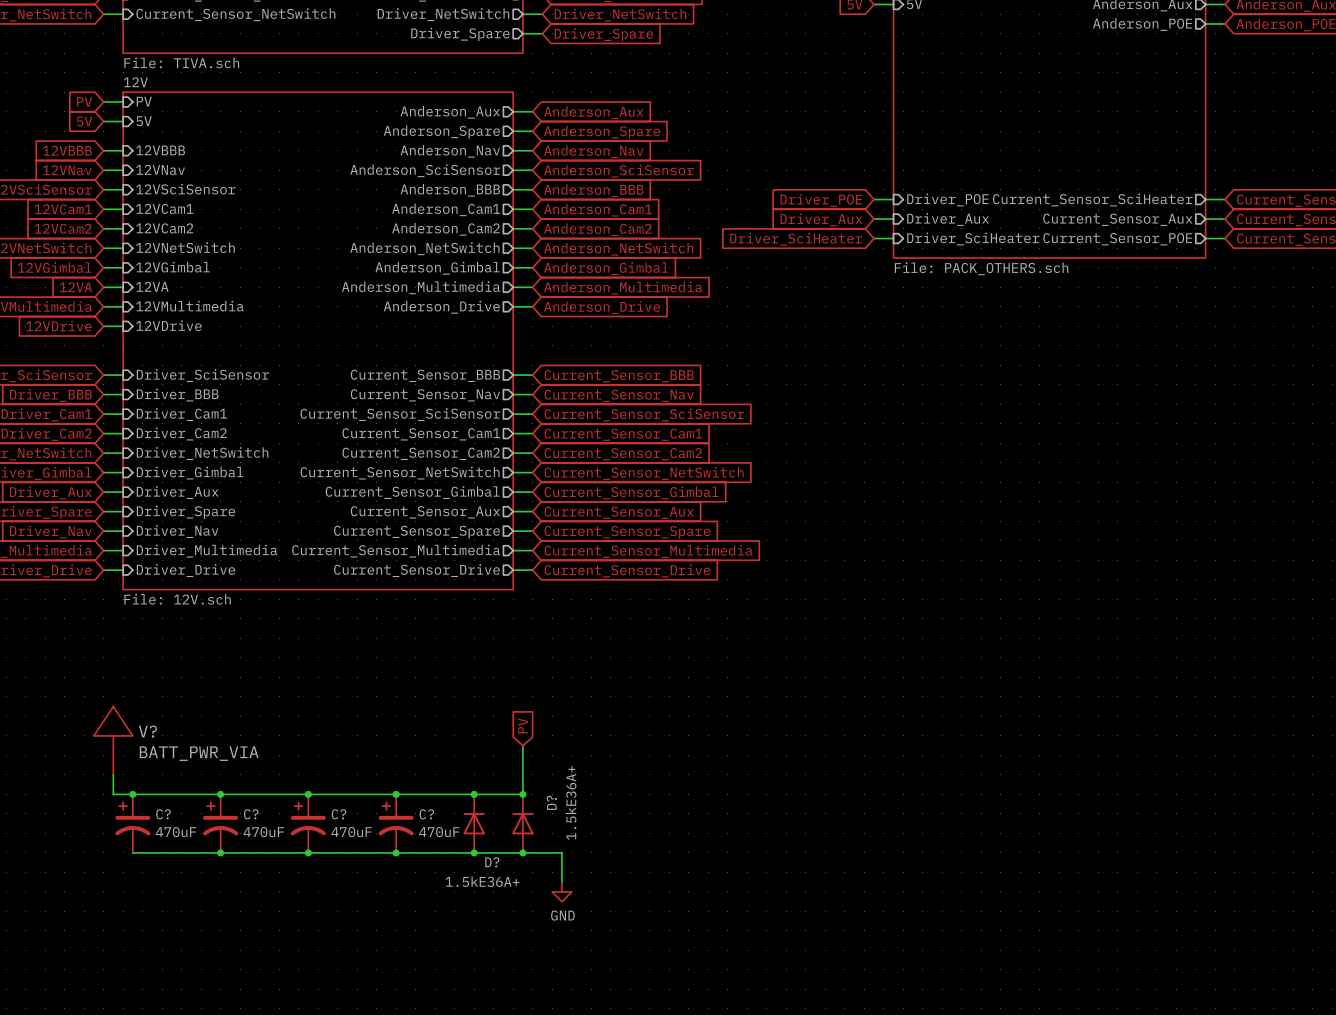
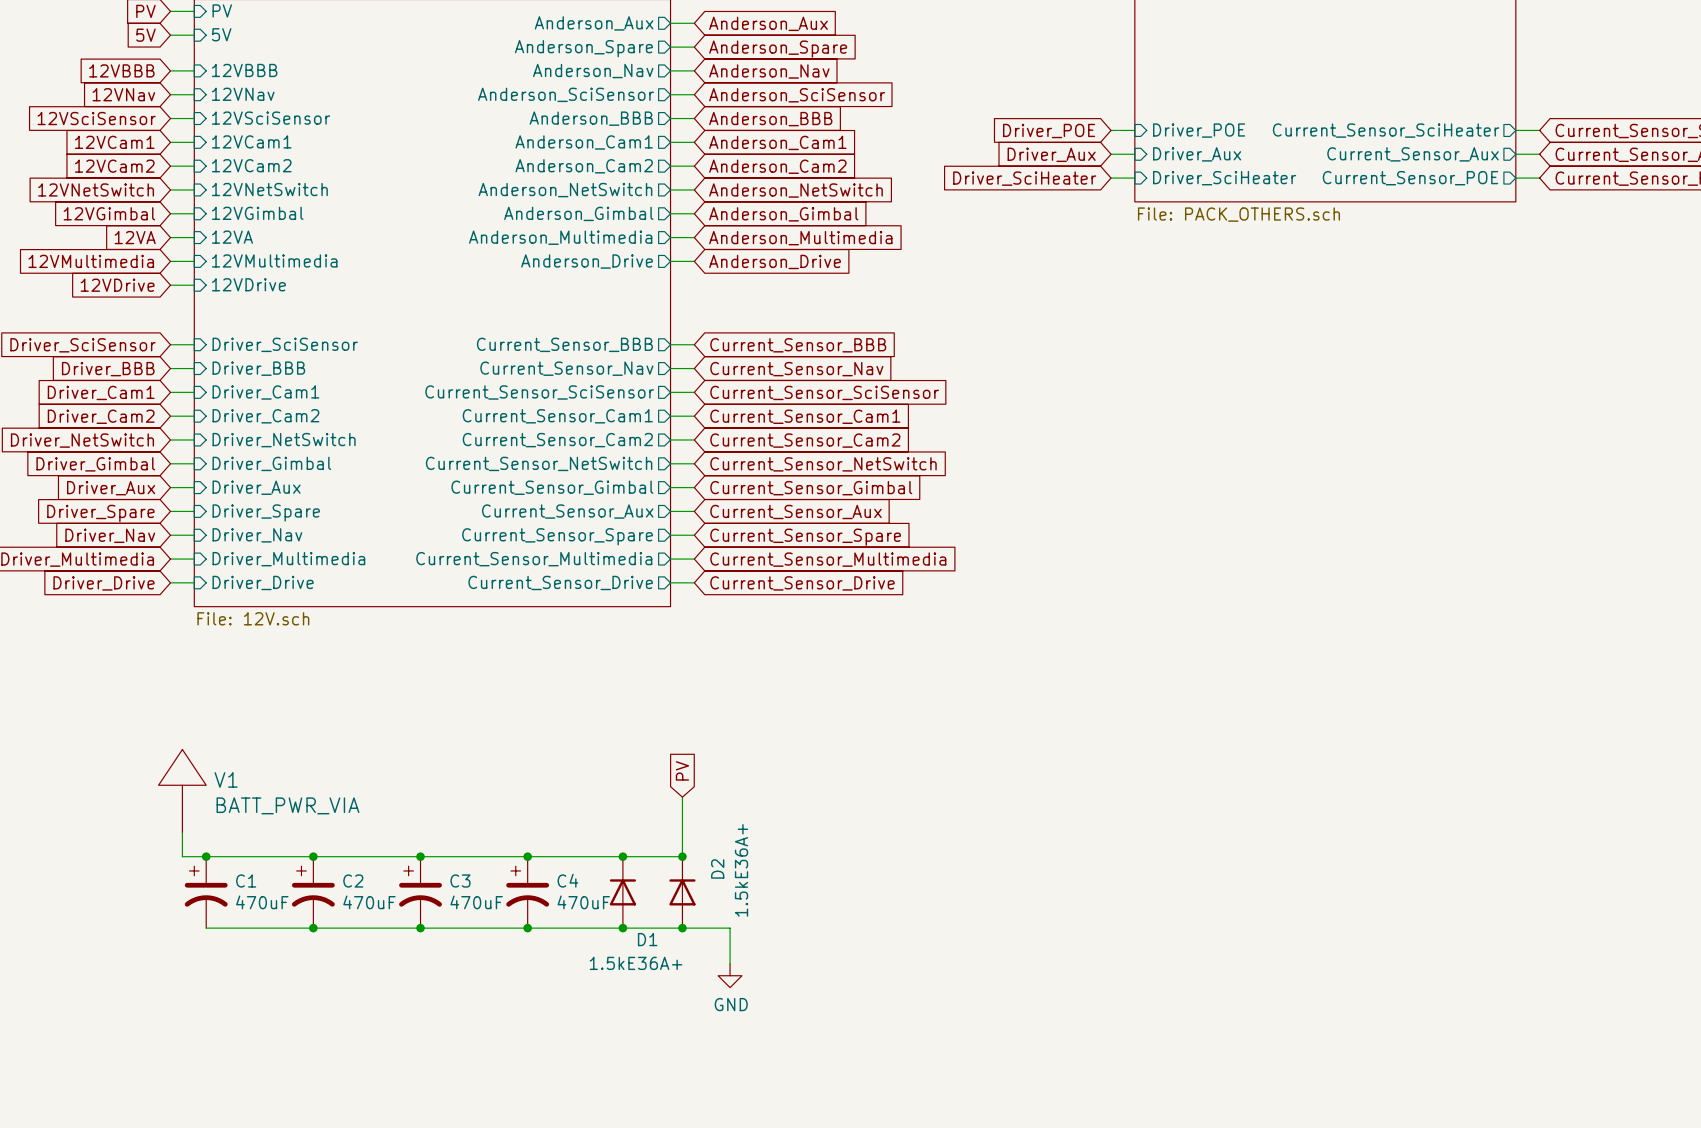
V? name: V? (147, 731) -> V1 (226, 779)
D? name: D? (551, 802) -> D2 (717, 868)
C? name: C? (163, 814) -> C1 (246, 881)
C? name: C? (251, 814) -> C2 (353, 881)
C? name: C? (339, 814) -> C3 (460, 881)
C? name: C? (426, 814) -> C4 (567, 880)
D? name: D? (492, 862) -> D1 (647, 939)

